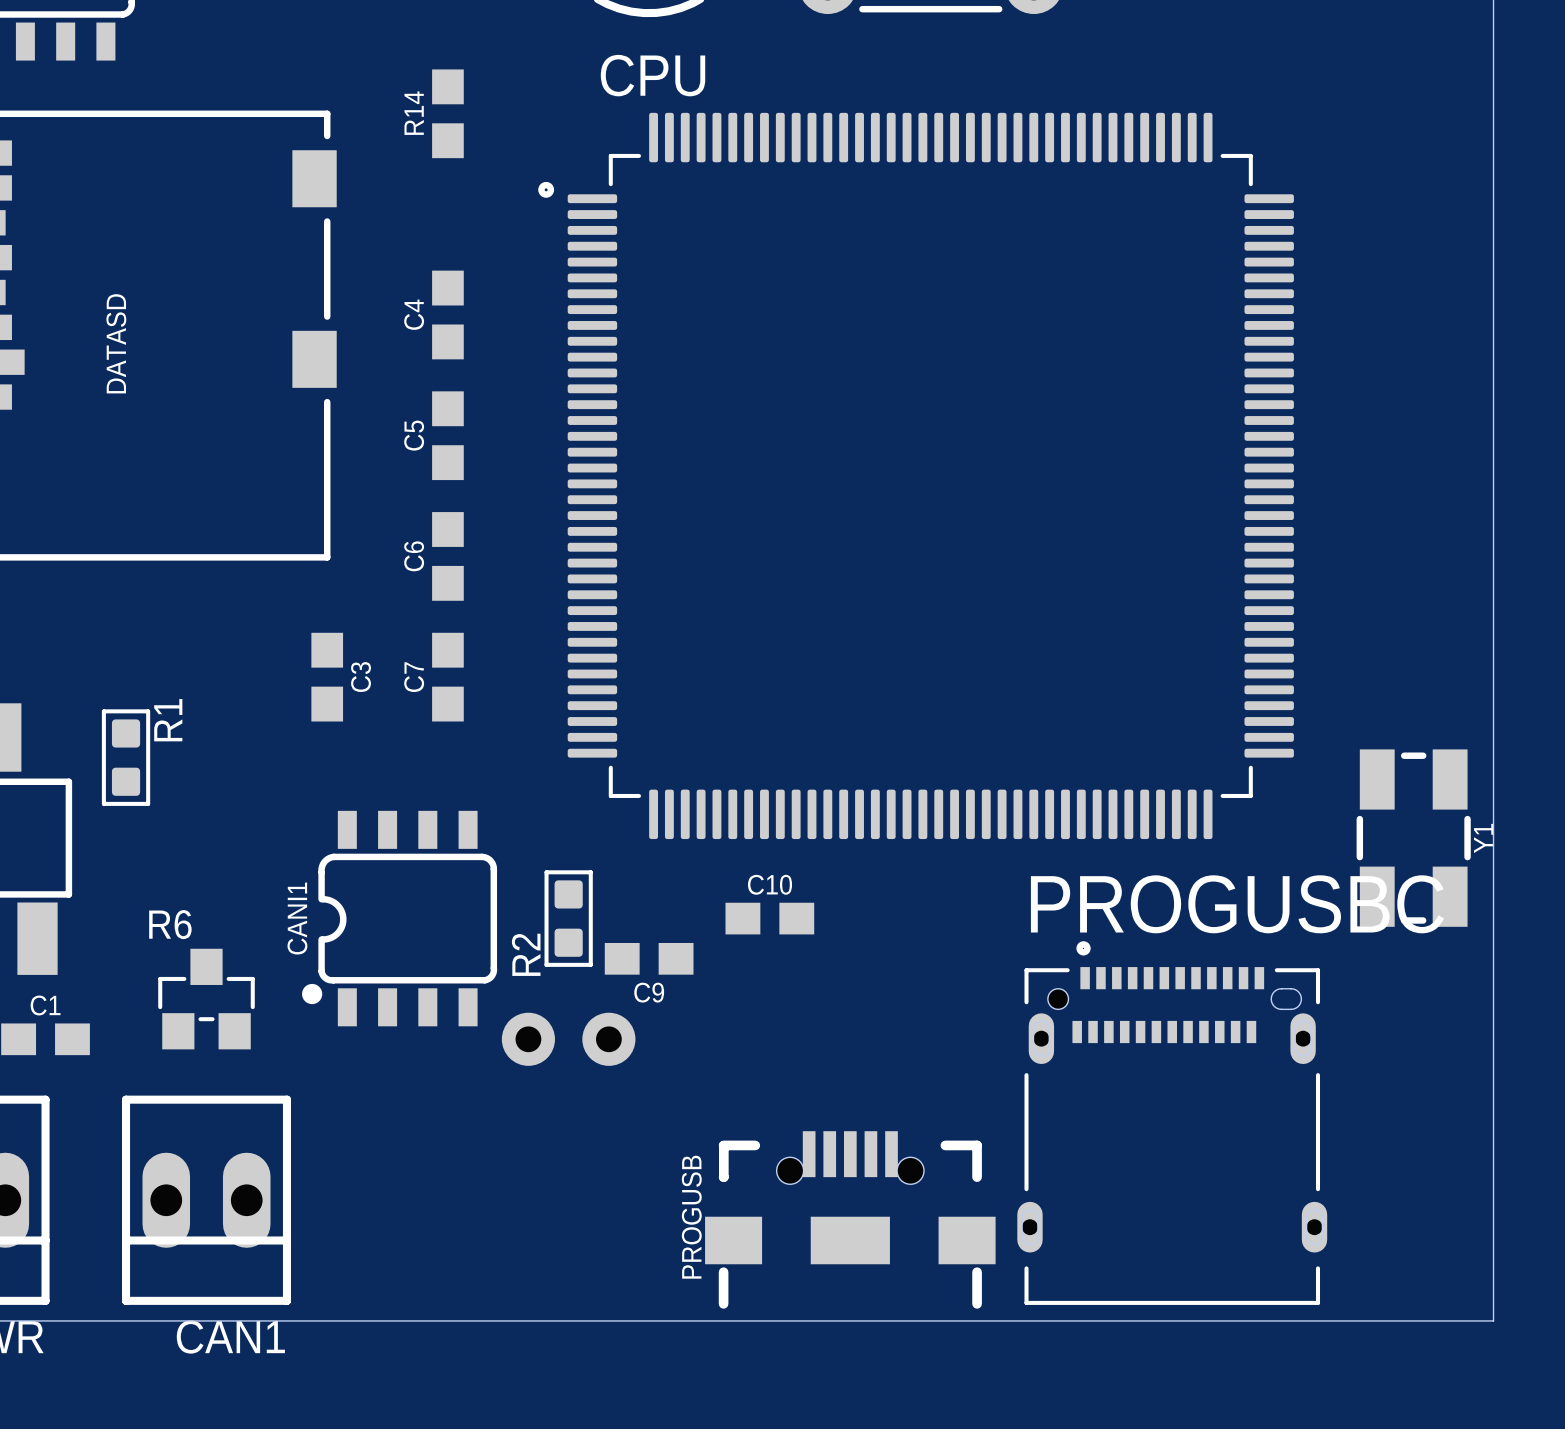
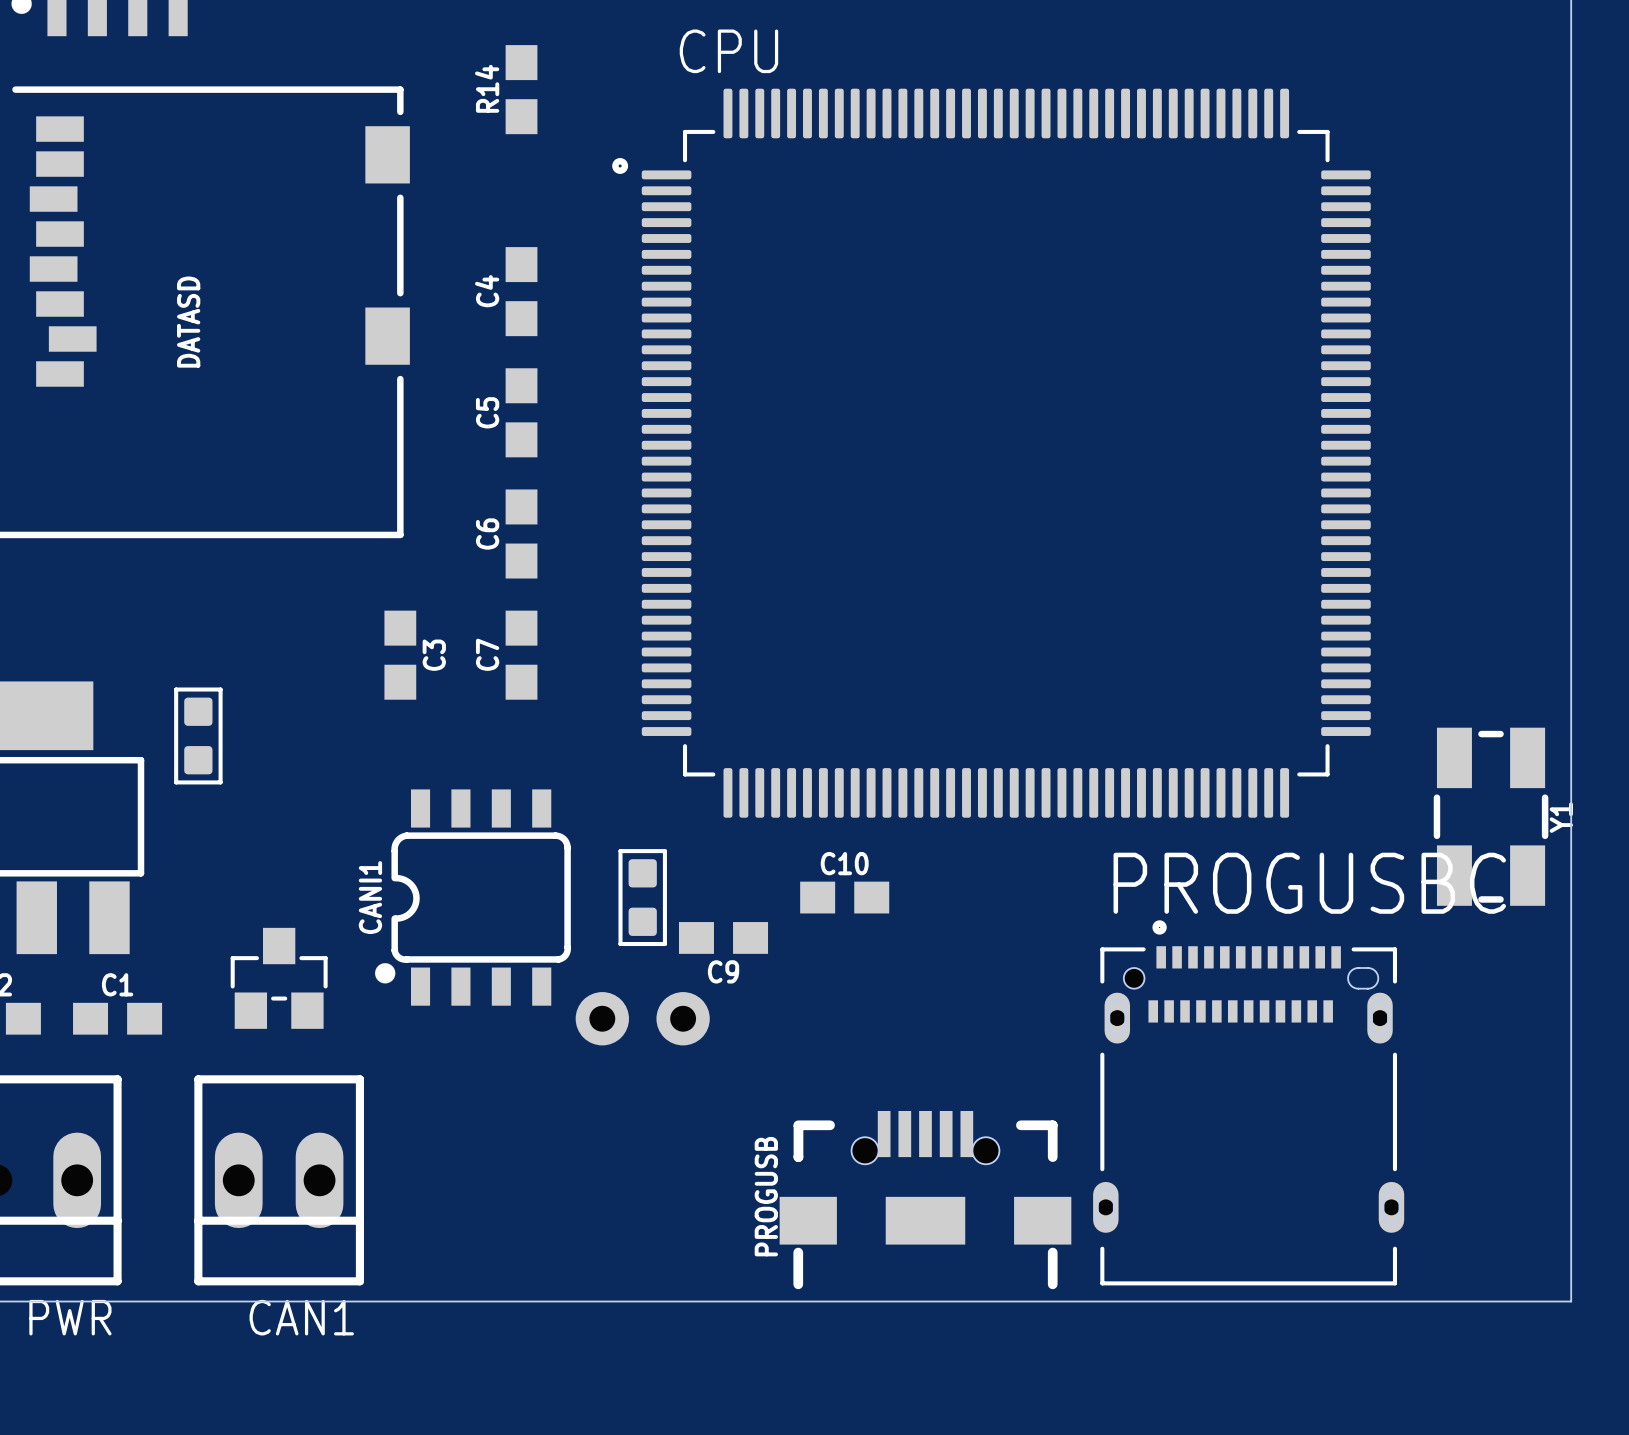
R1 name: R1 (168, 720) -> none
R6 name: R6 (170, 924) -> none
R2 name: R2 (526, 954) -> none

